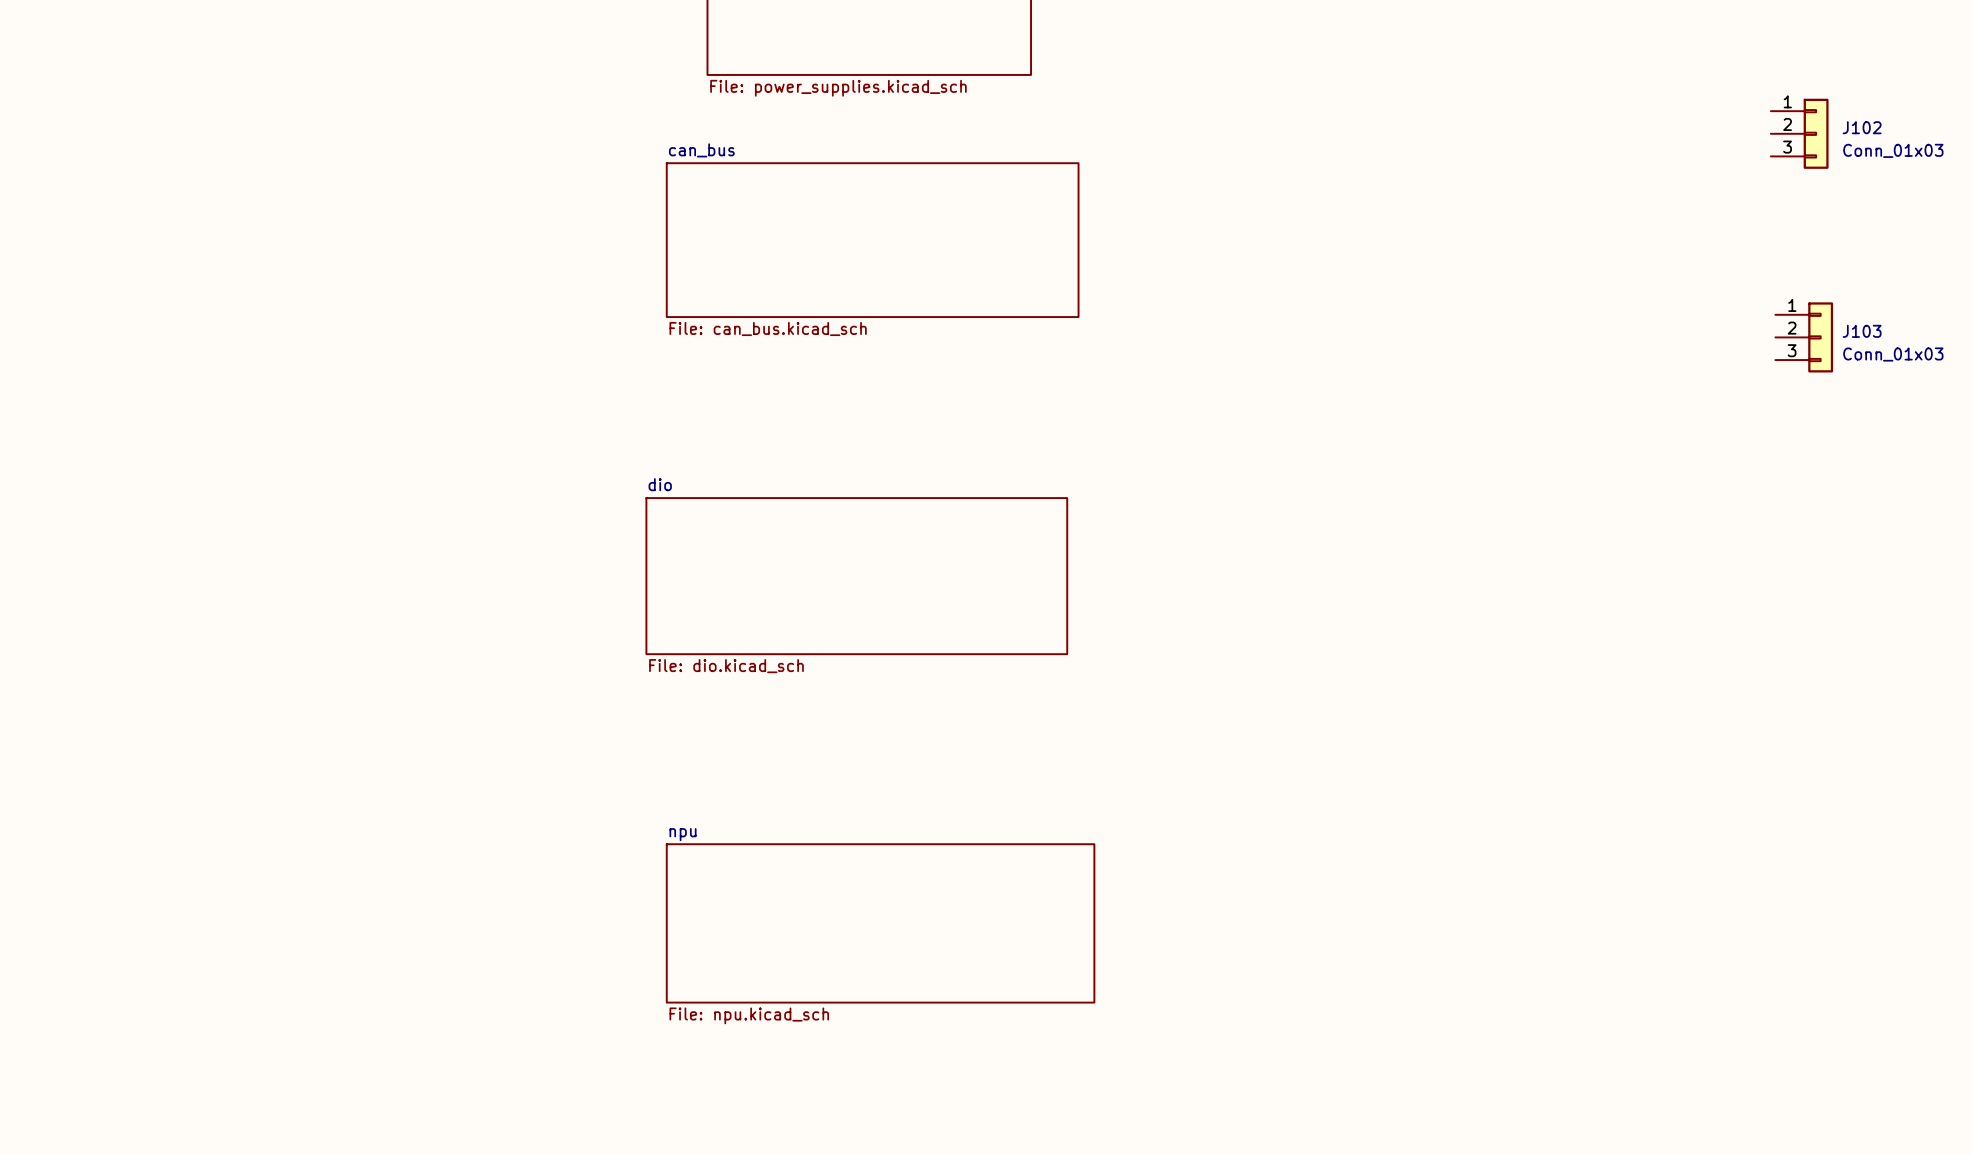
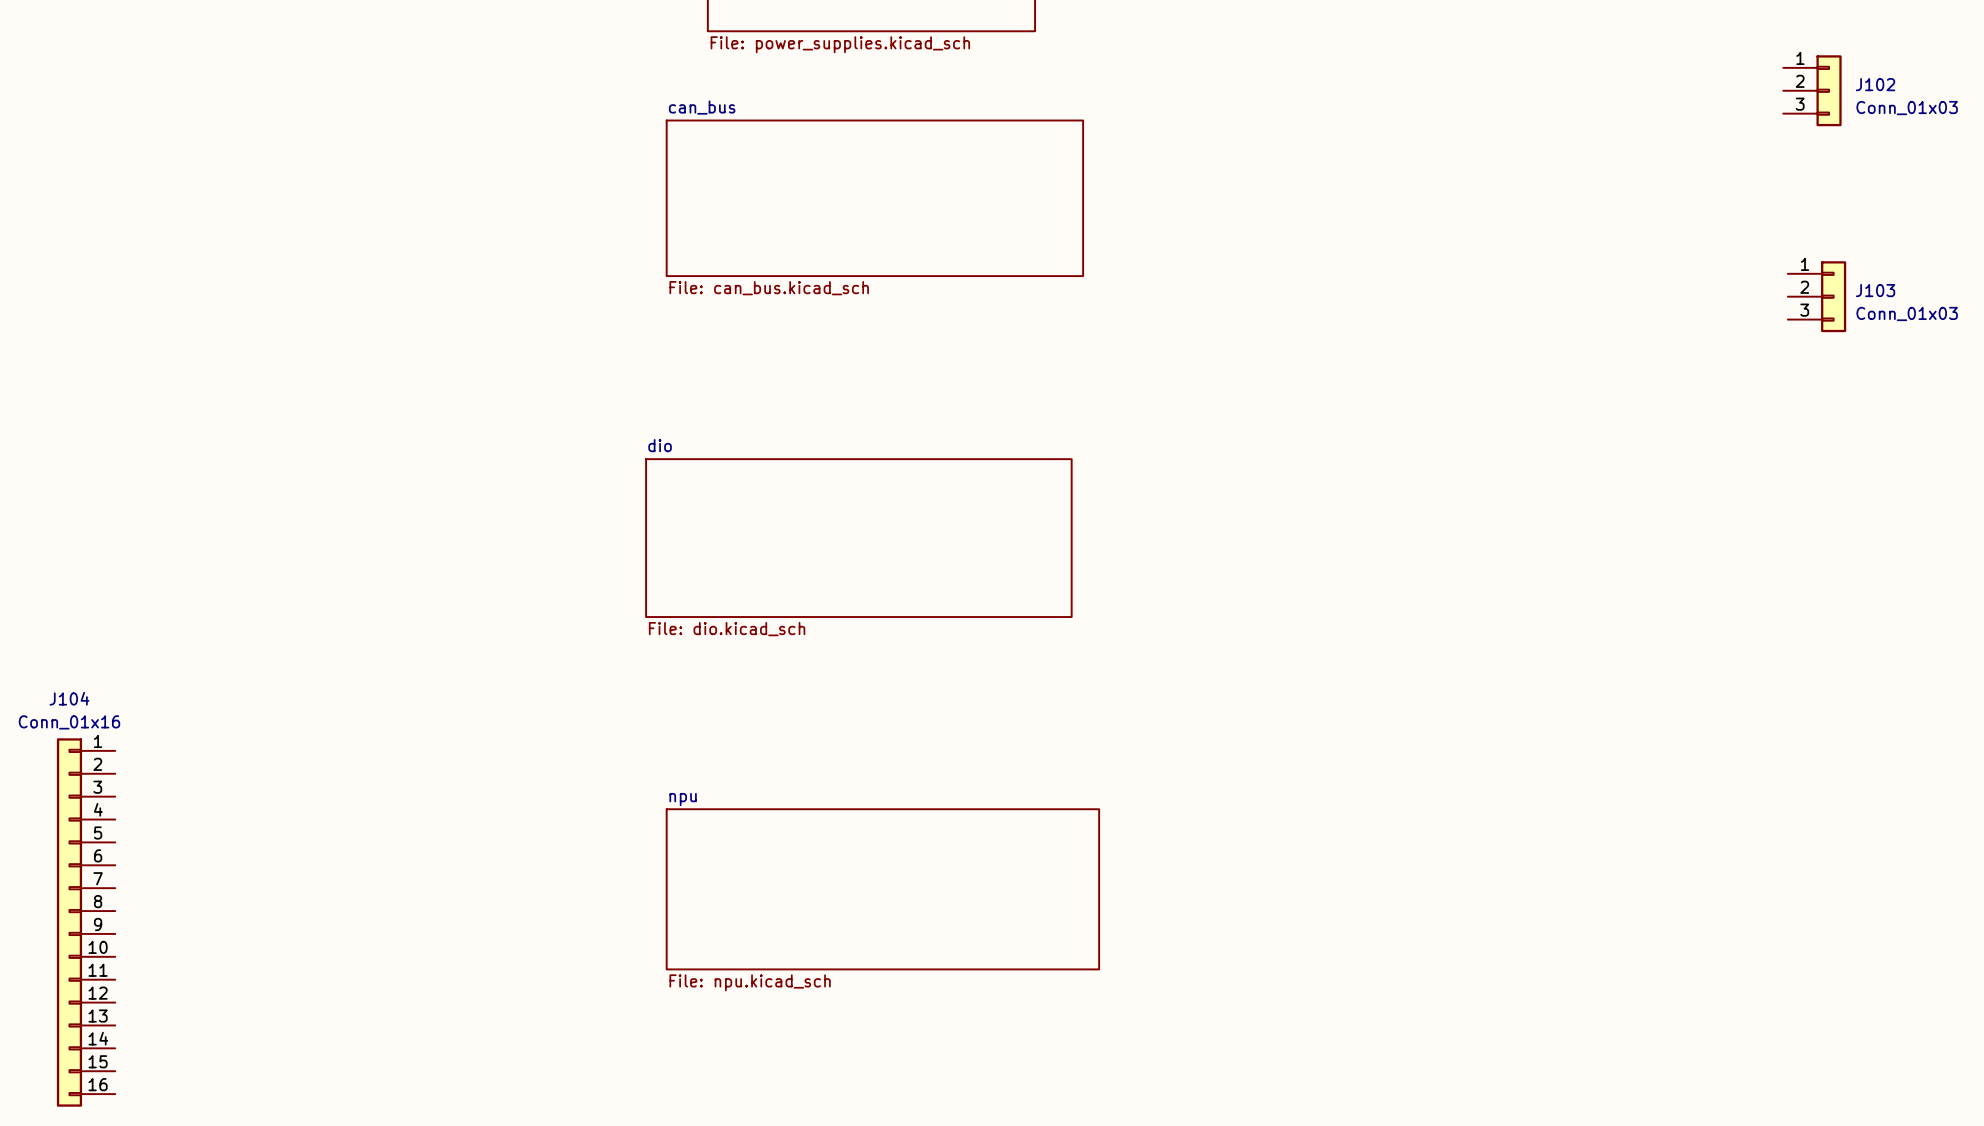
J104: none -> Conn_01x16 (86, 922)

